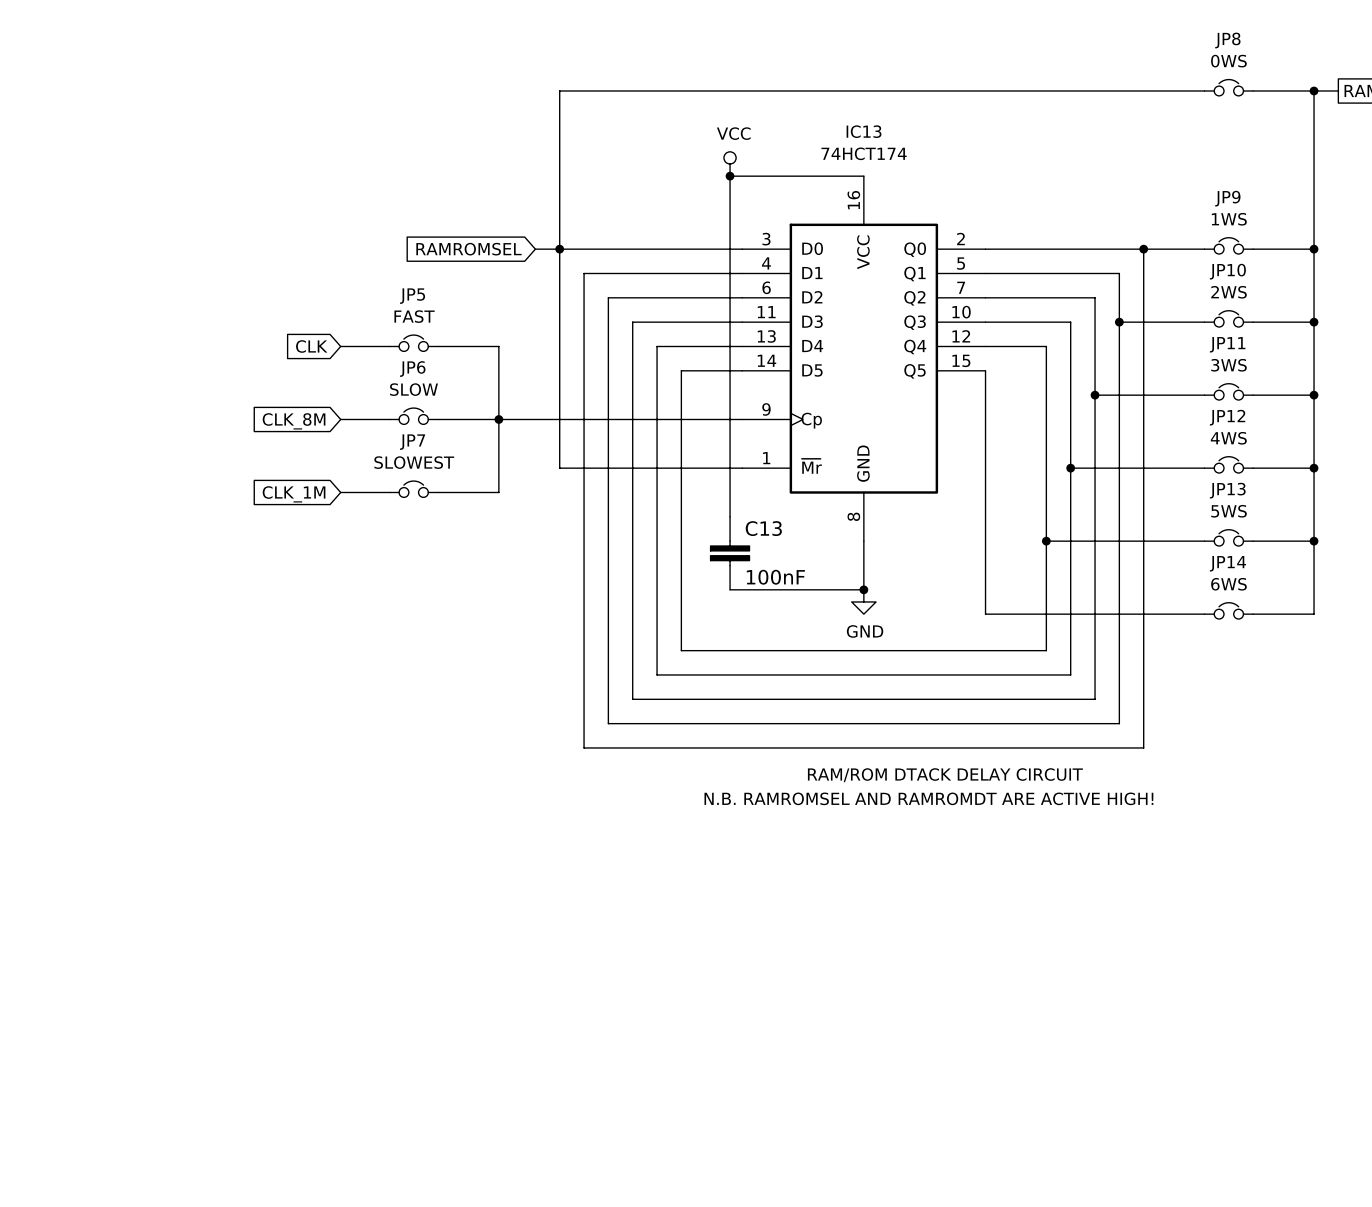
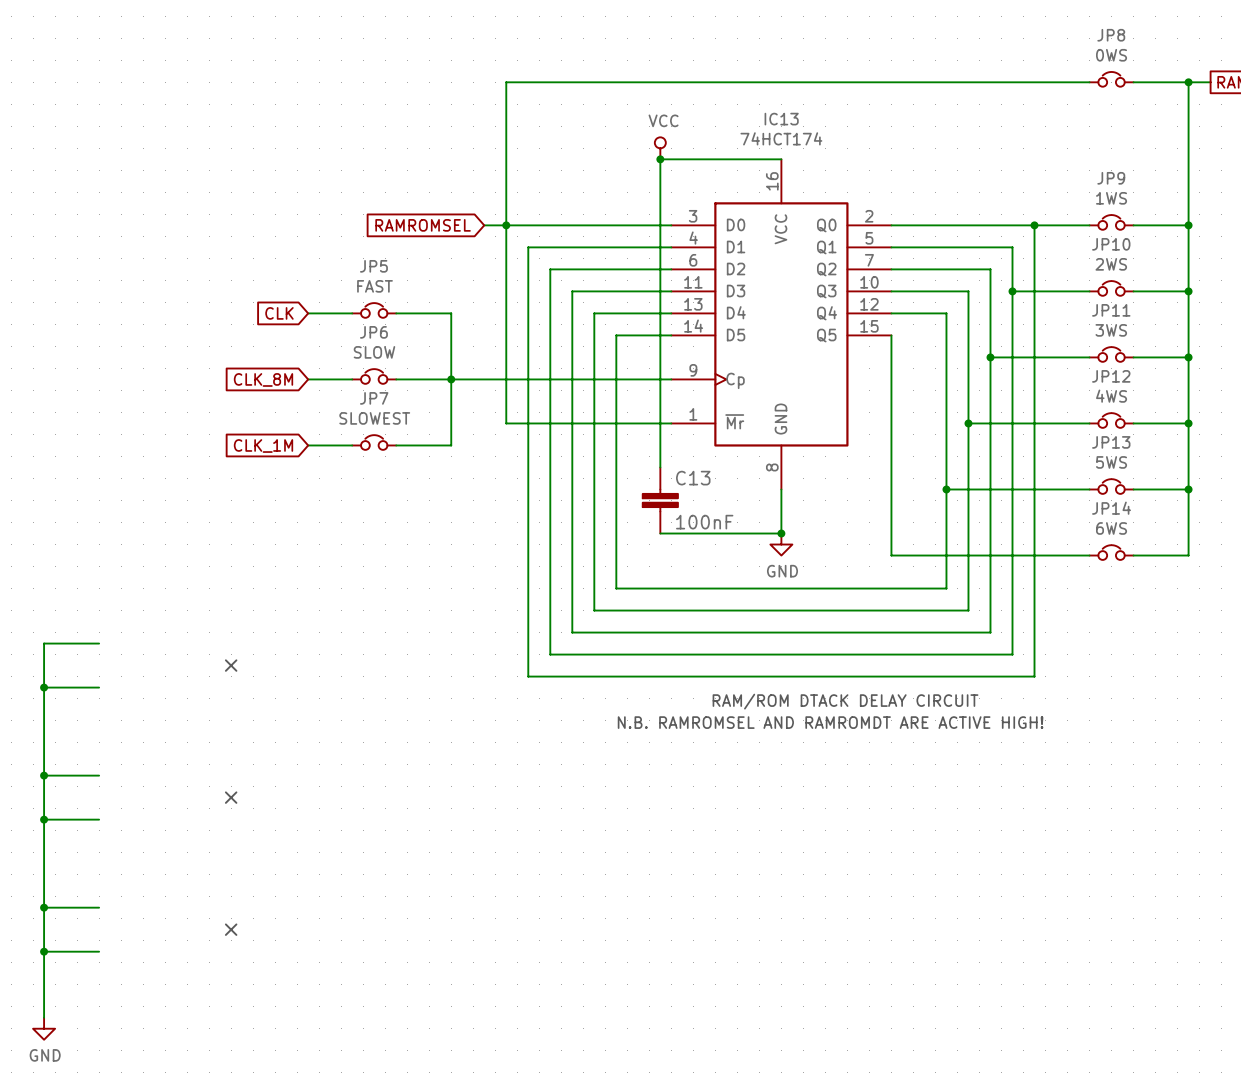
wire: none -> (99, 643) (44, 643) (44, 1017)
no-connect mark: none -> (231, 665)
wire: none -> (44, 687) (99, 687)
junction: none -> (44, 687)
wire: none -> (44, 775) (99, 775)
junction: none -> (44, 775)
no-connect mark: none -> (231, 797)
wire: none -> (44, 819) (99, 819)
junction: none -> (44, 819)
wire: none -> (44, 907) (99, 907)
junction: none -> (44, 907)
no-connect mark: none -> (231, 929)
wire: none -> (44, 951) (99, 951)
junction: none -> (44, 951)
power symbol: none -> GND (44, 1028)

